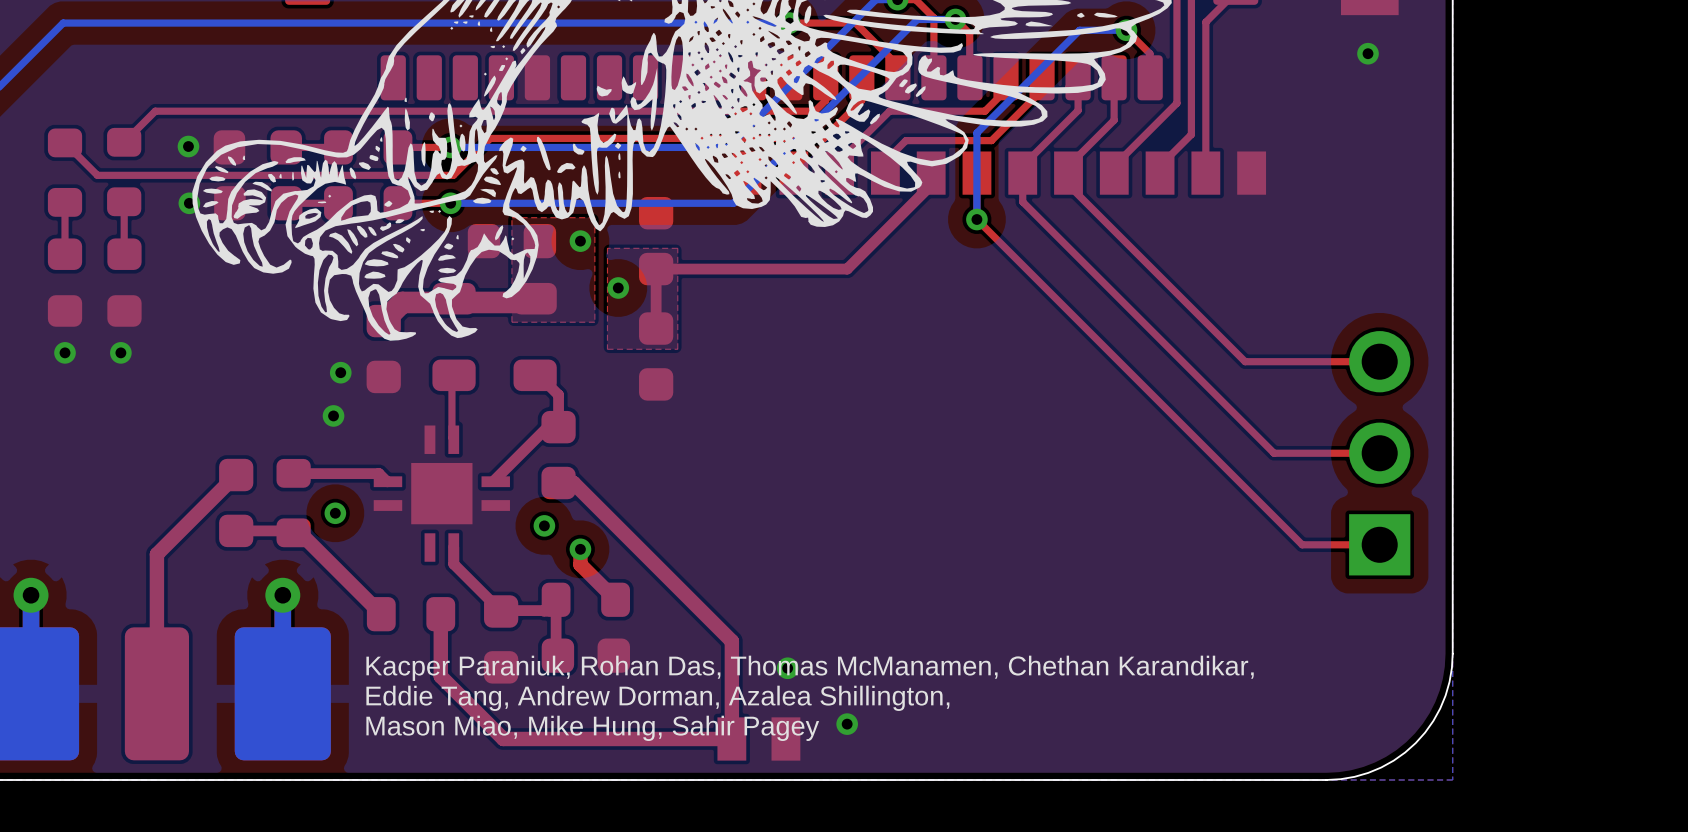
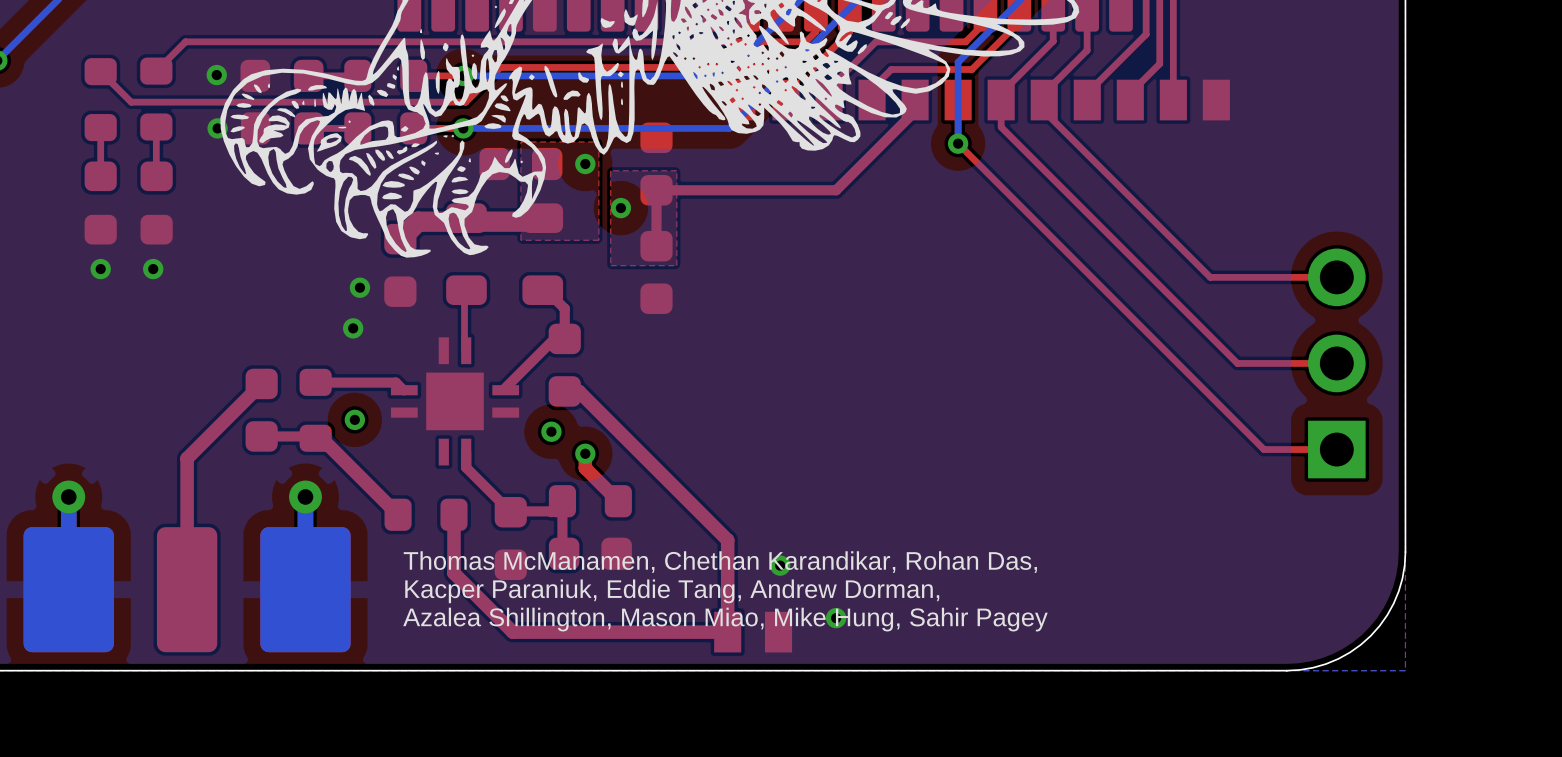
text: Kacper Paraniuk, Rohan Das, Thomas McManamen, Chethan Karandikar, (810, 668) -> Thomas McManamen, Chethan Karandikar, Rohan Das, (720, 562)
text: none -> Kacper Paraniuk, Eddie Tang, Andrew Dorman, (672, 591)
text: Eddie Tang, Andrew Dorman, Azalea Shillington, (657, 698) -> none
text: Mason Miao, Mike Hung, Sahir Pagey (592, 728) -> Azalea Shillington, Mason Miao, Mike Hung, Sahir Pagey (725, 619)

